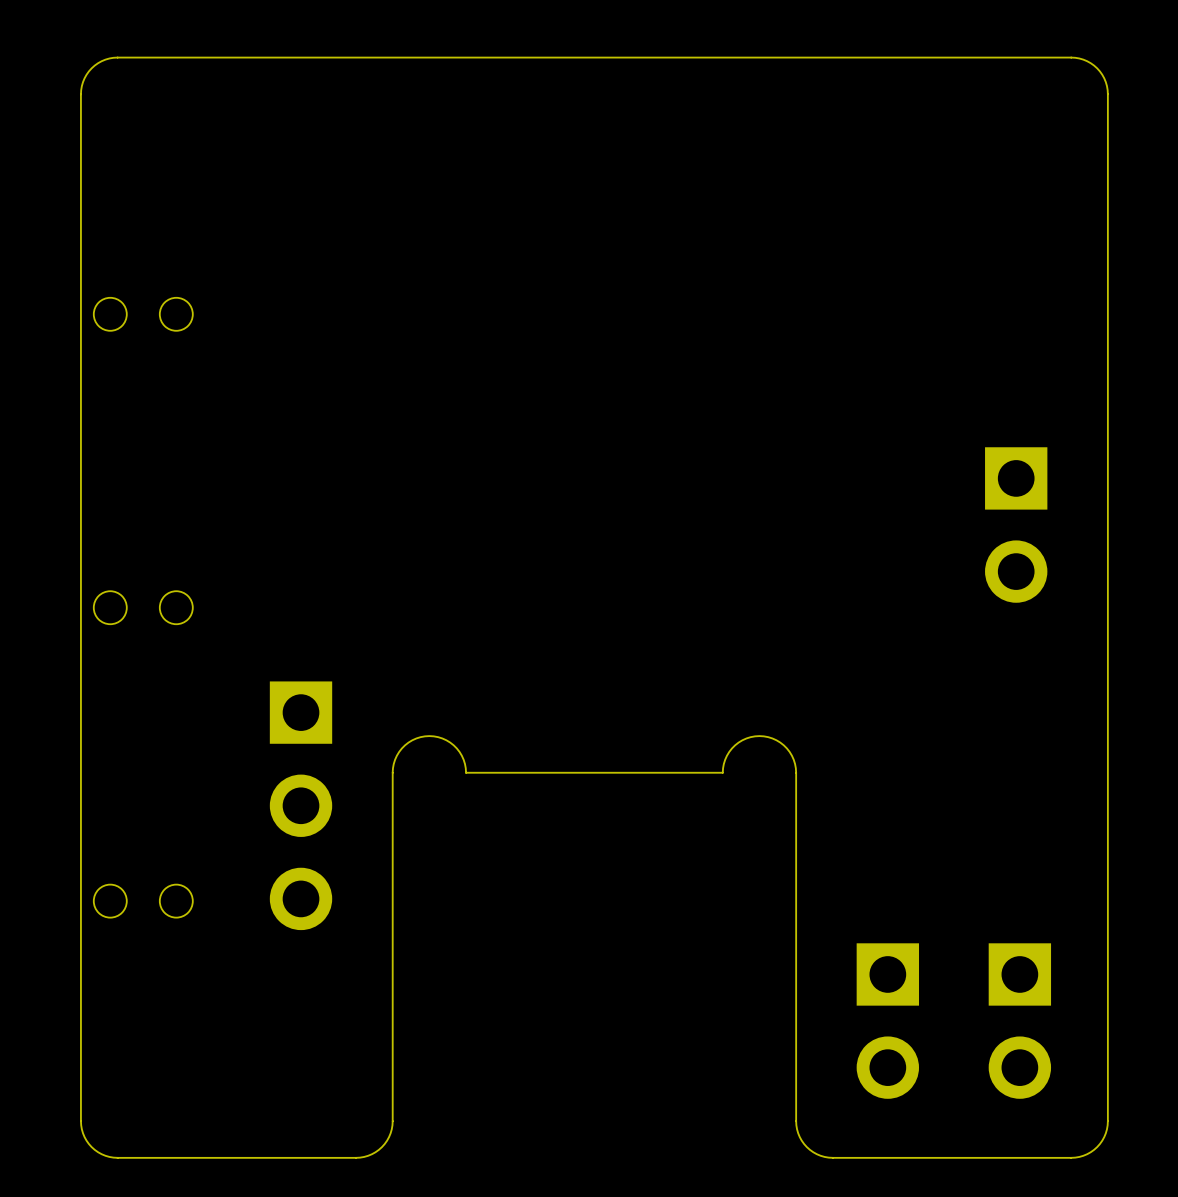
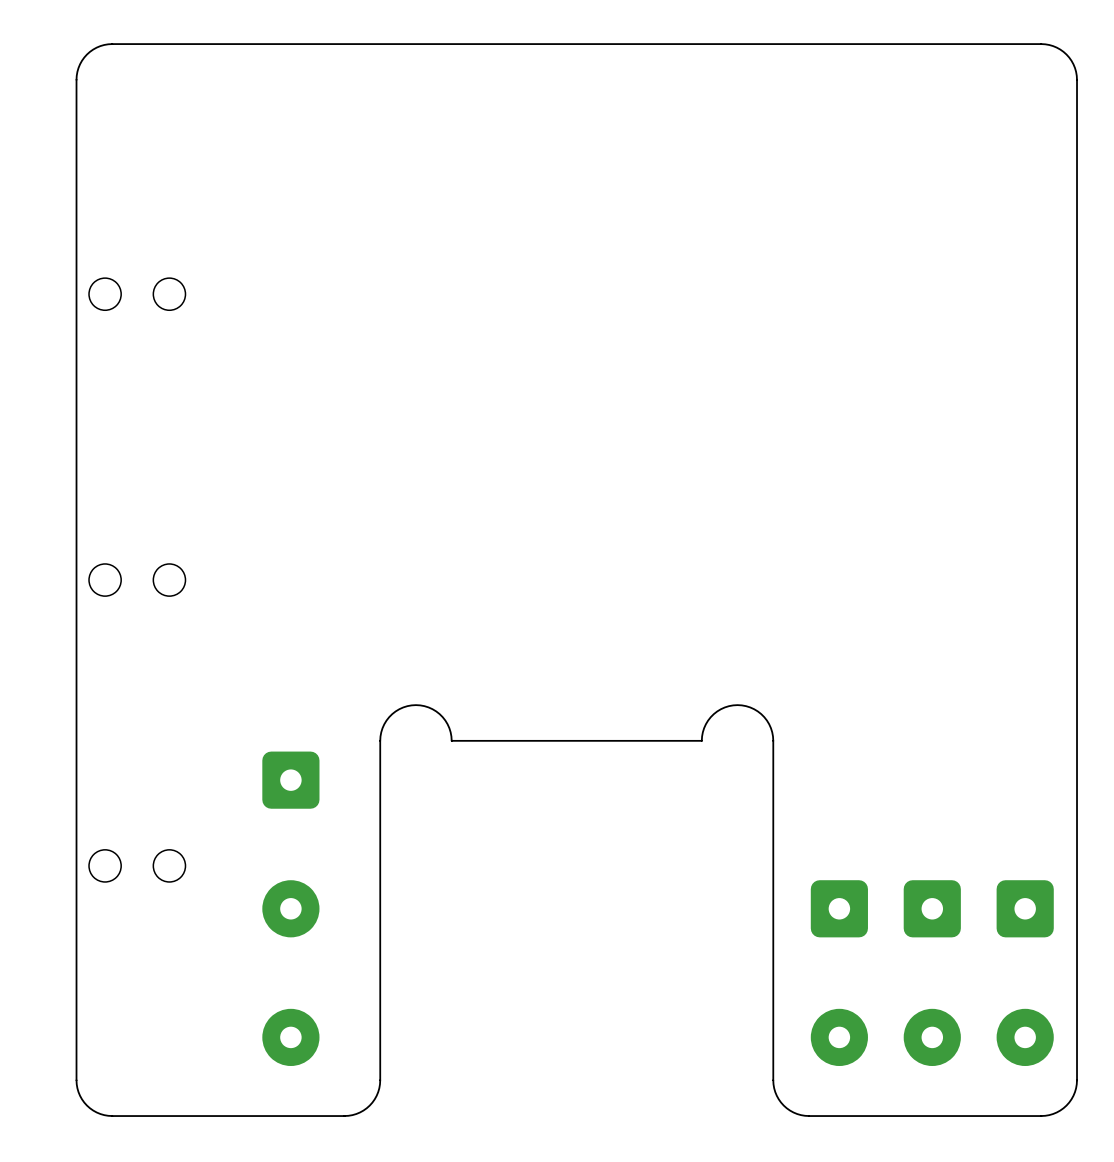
part: (1016, 525) -> none
part: (301, 805) -> none
part footprint: [856, 943, 920, 1099] -> [810, 880, 868, 1067]
part: none -> (290, 908)
part: none -> (932, 973)
part: none -> (1025, 973)
part: (1019, 1021) -> none

